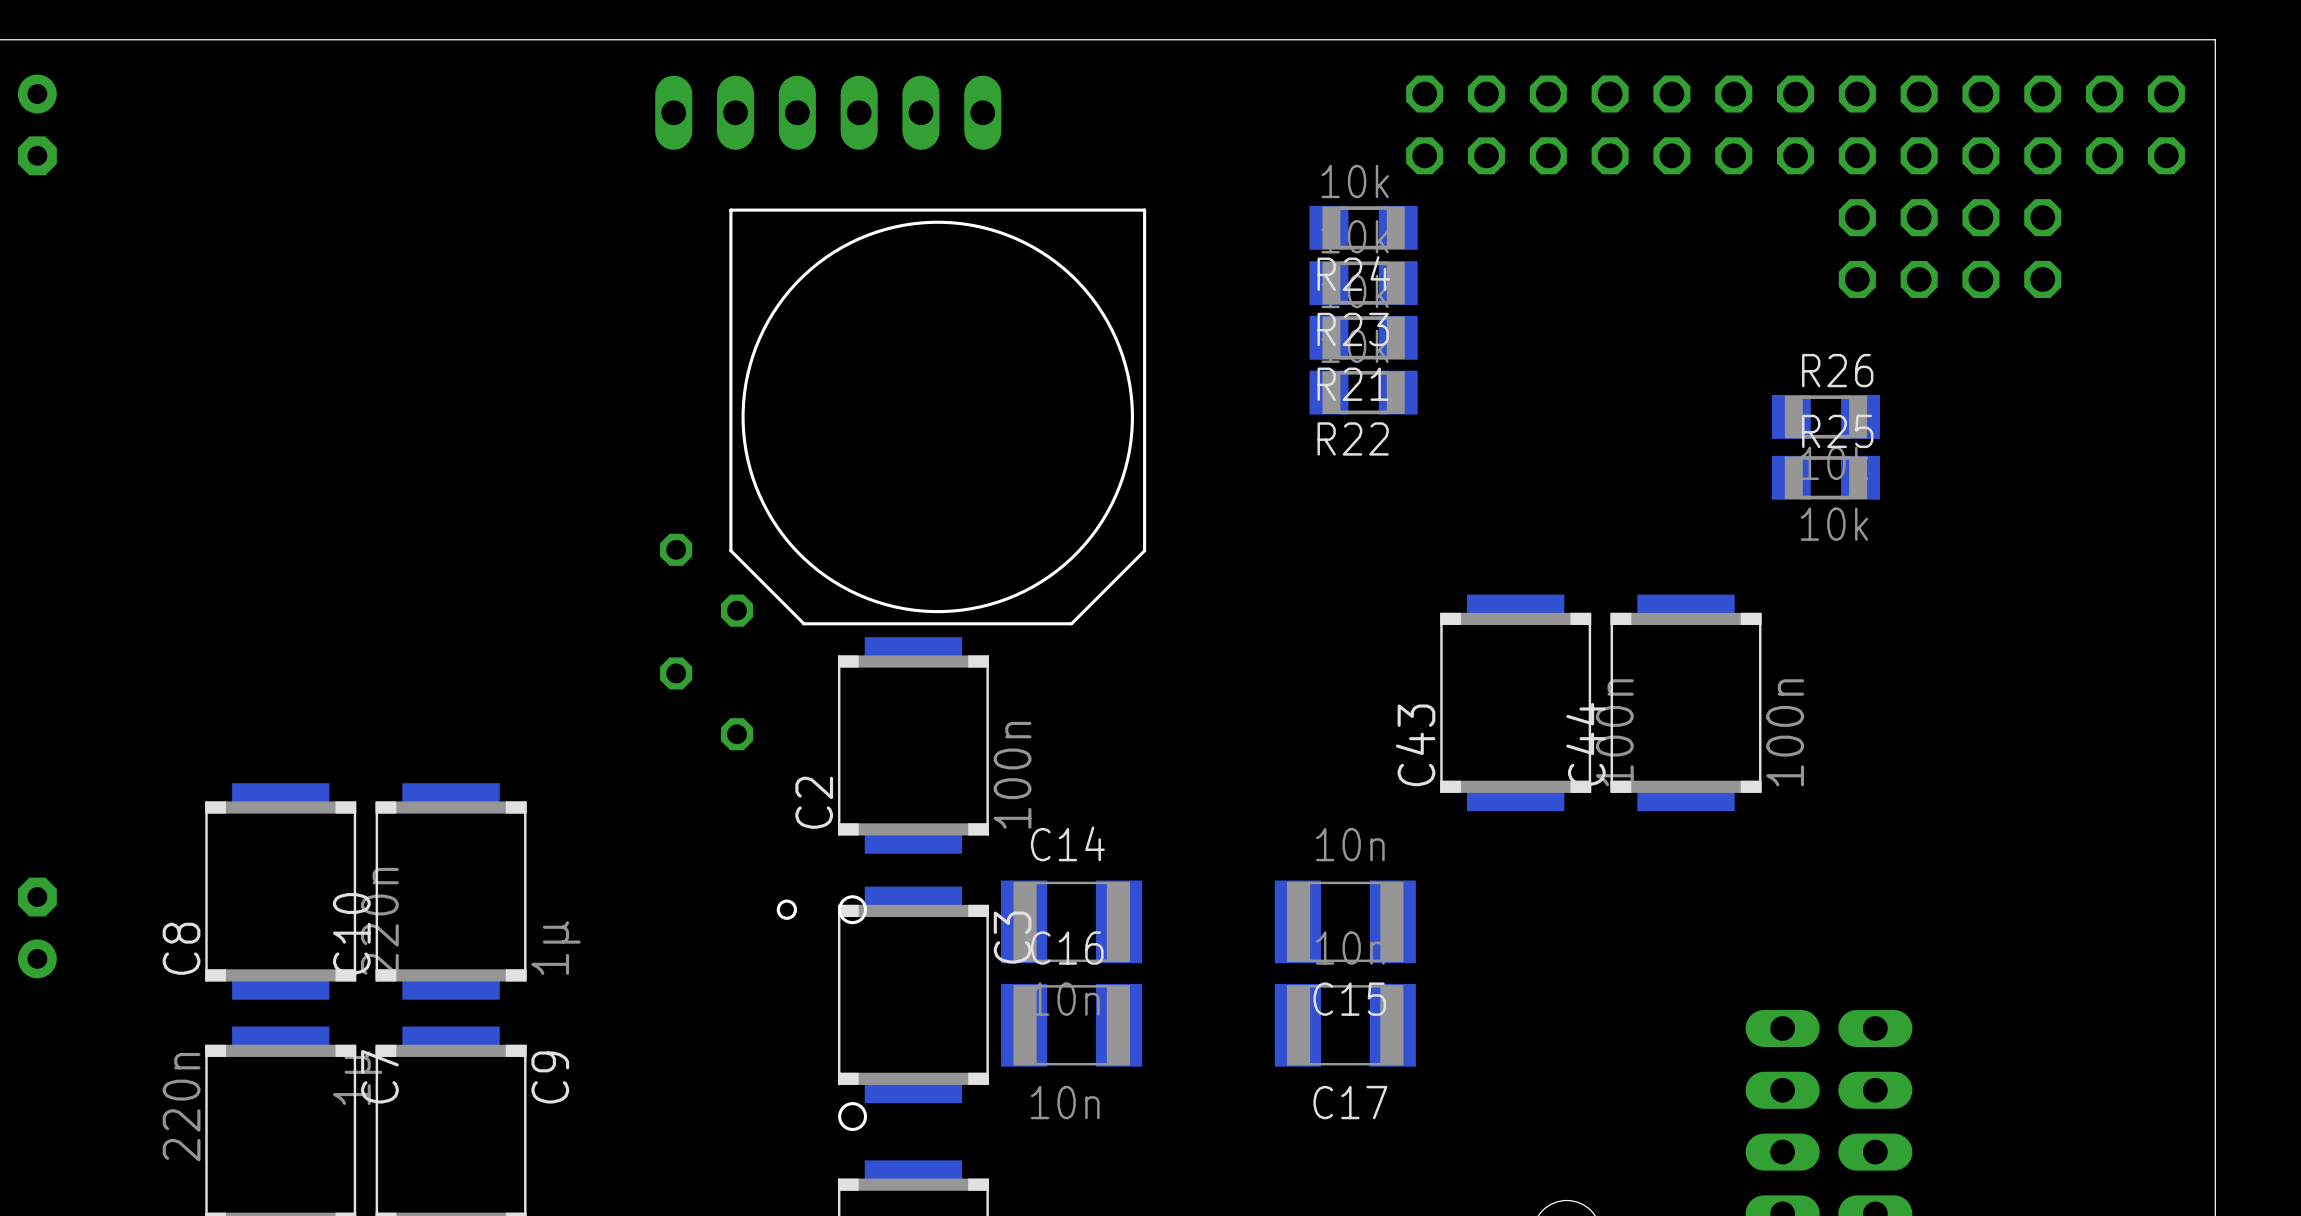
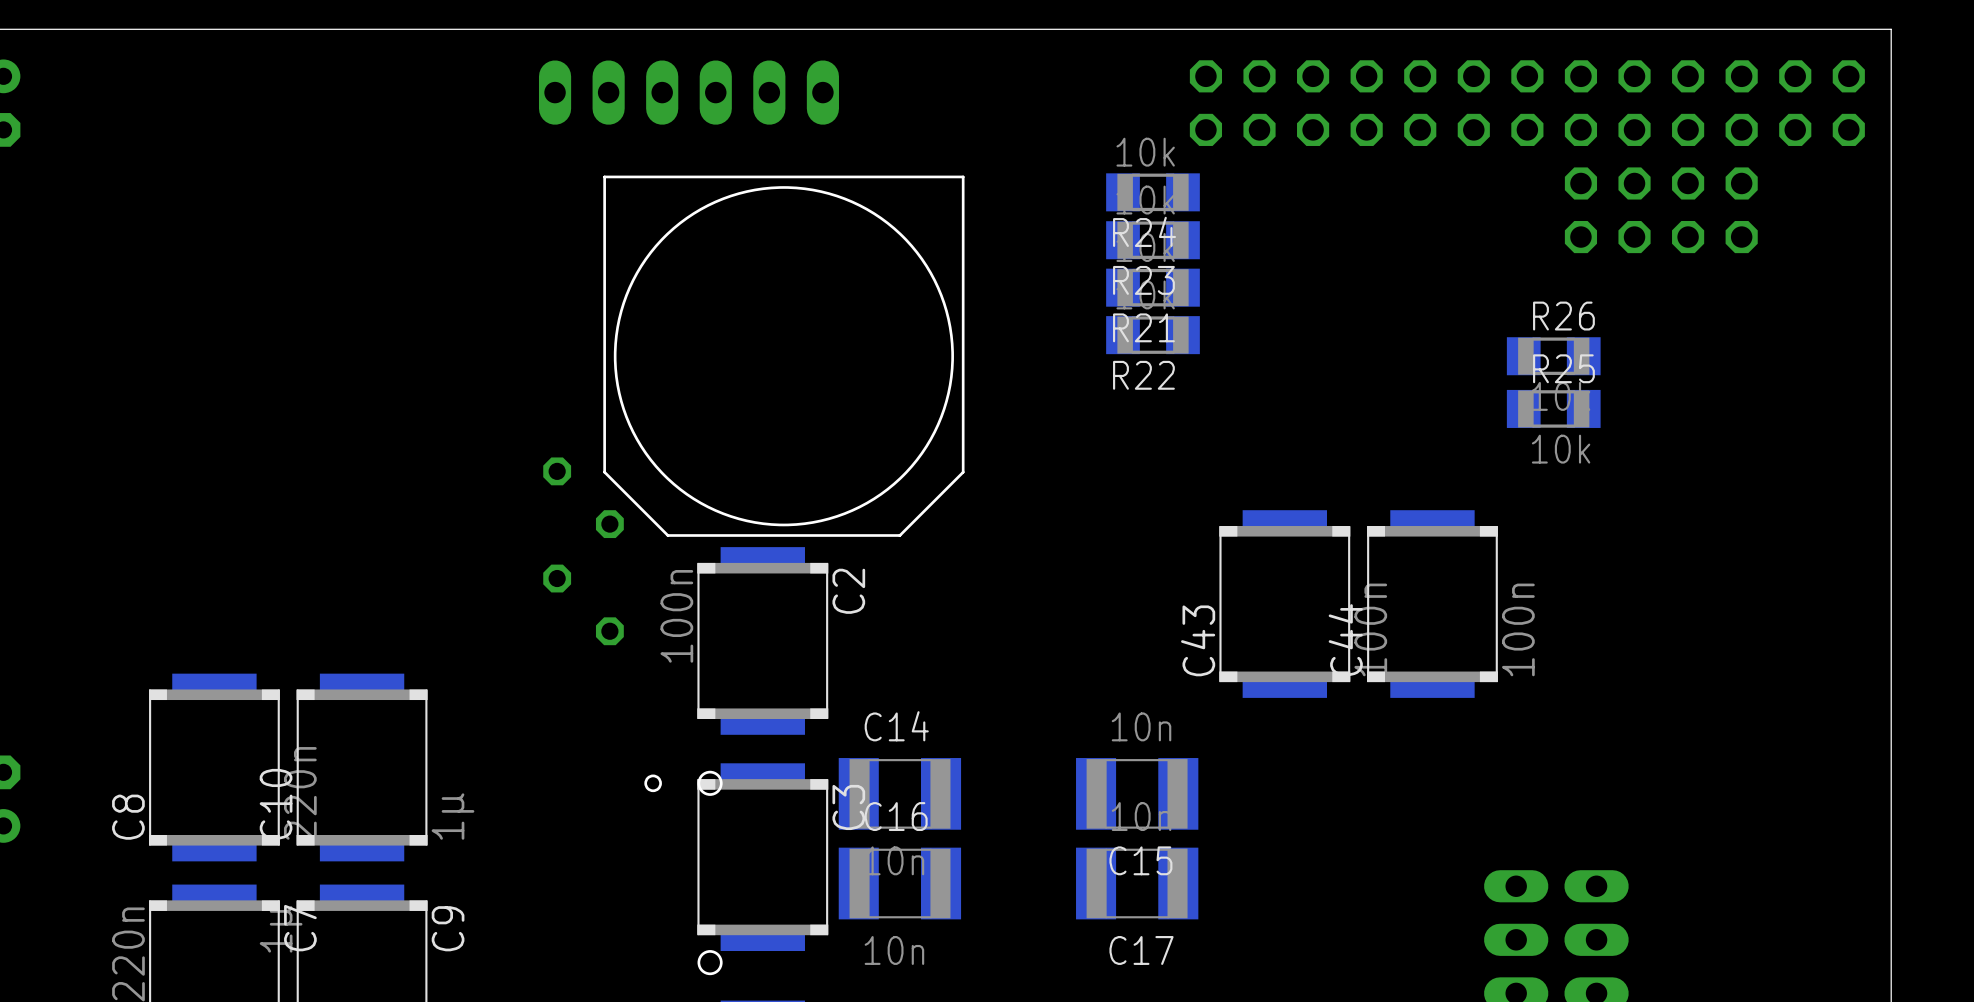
C2 value position: 100n (1012, 775) -> 100n (676, 616)
C2 name position: C2 (814, 802) -> C2 (848, 591)

